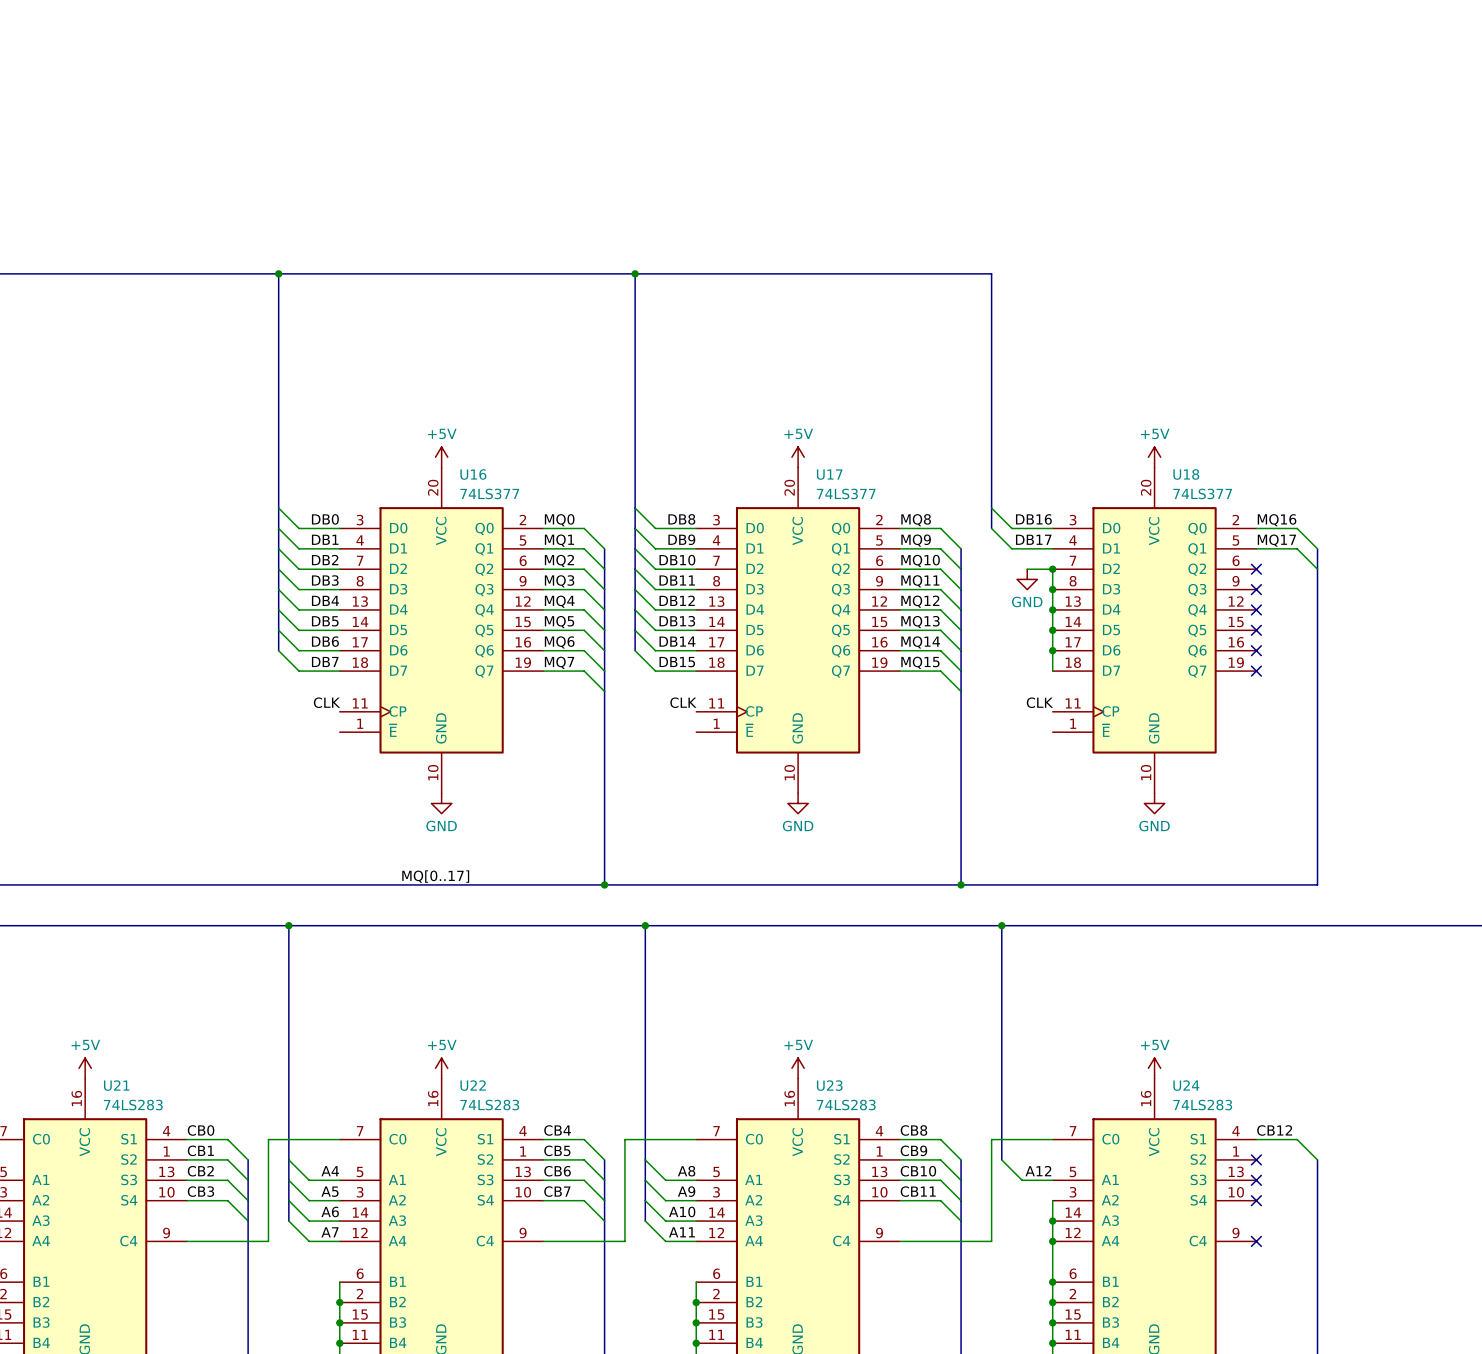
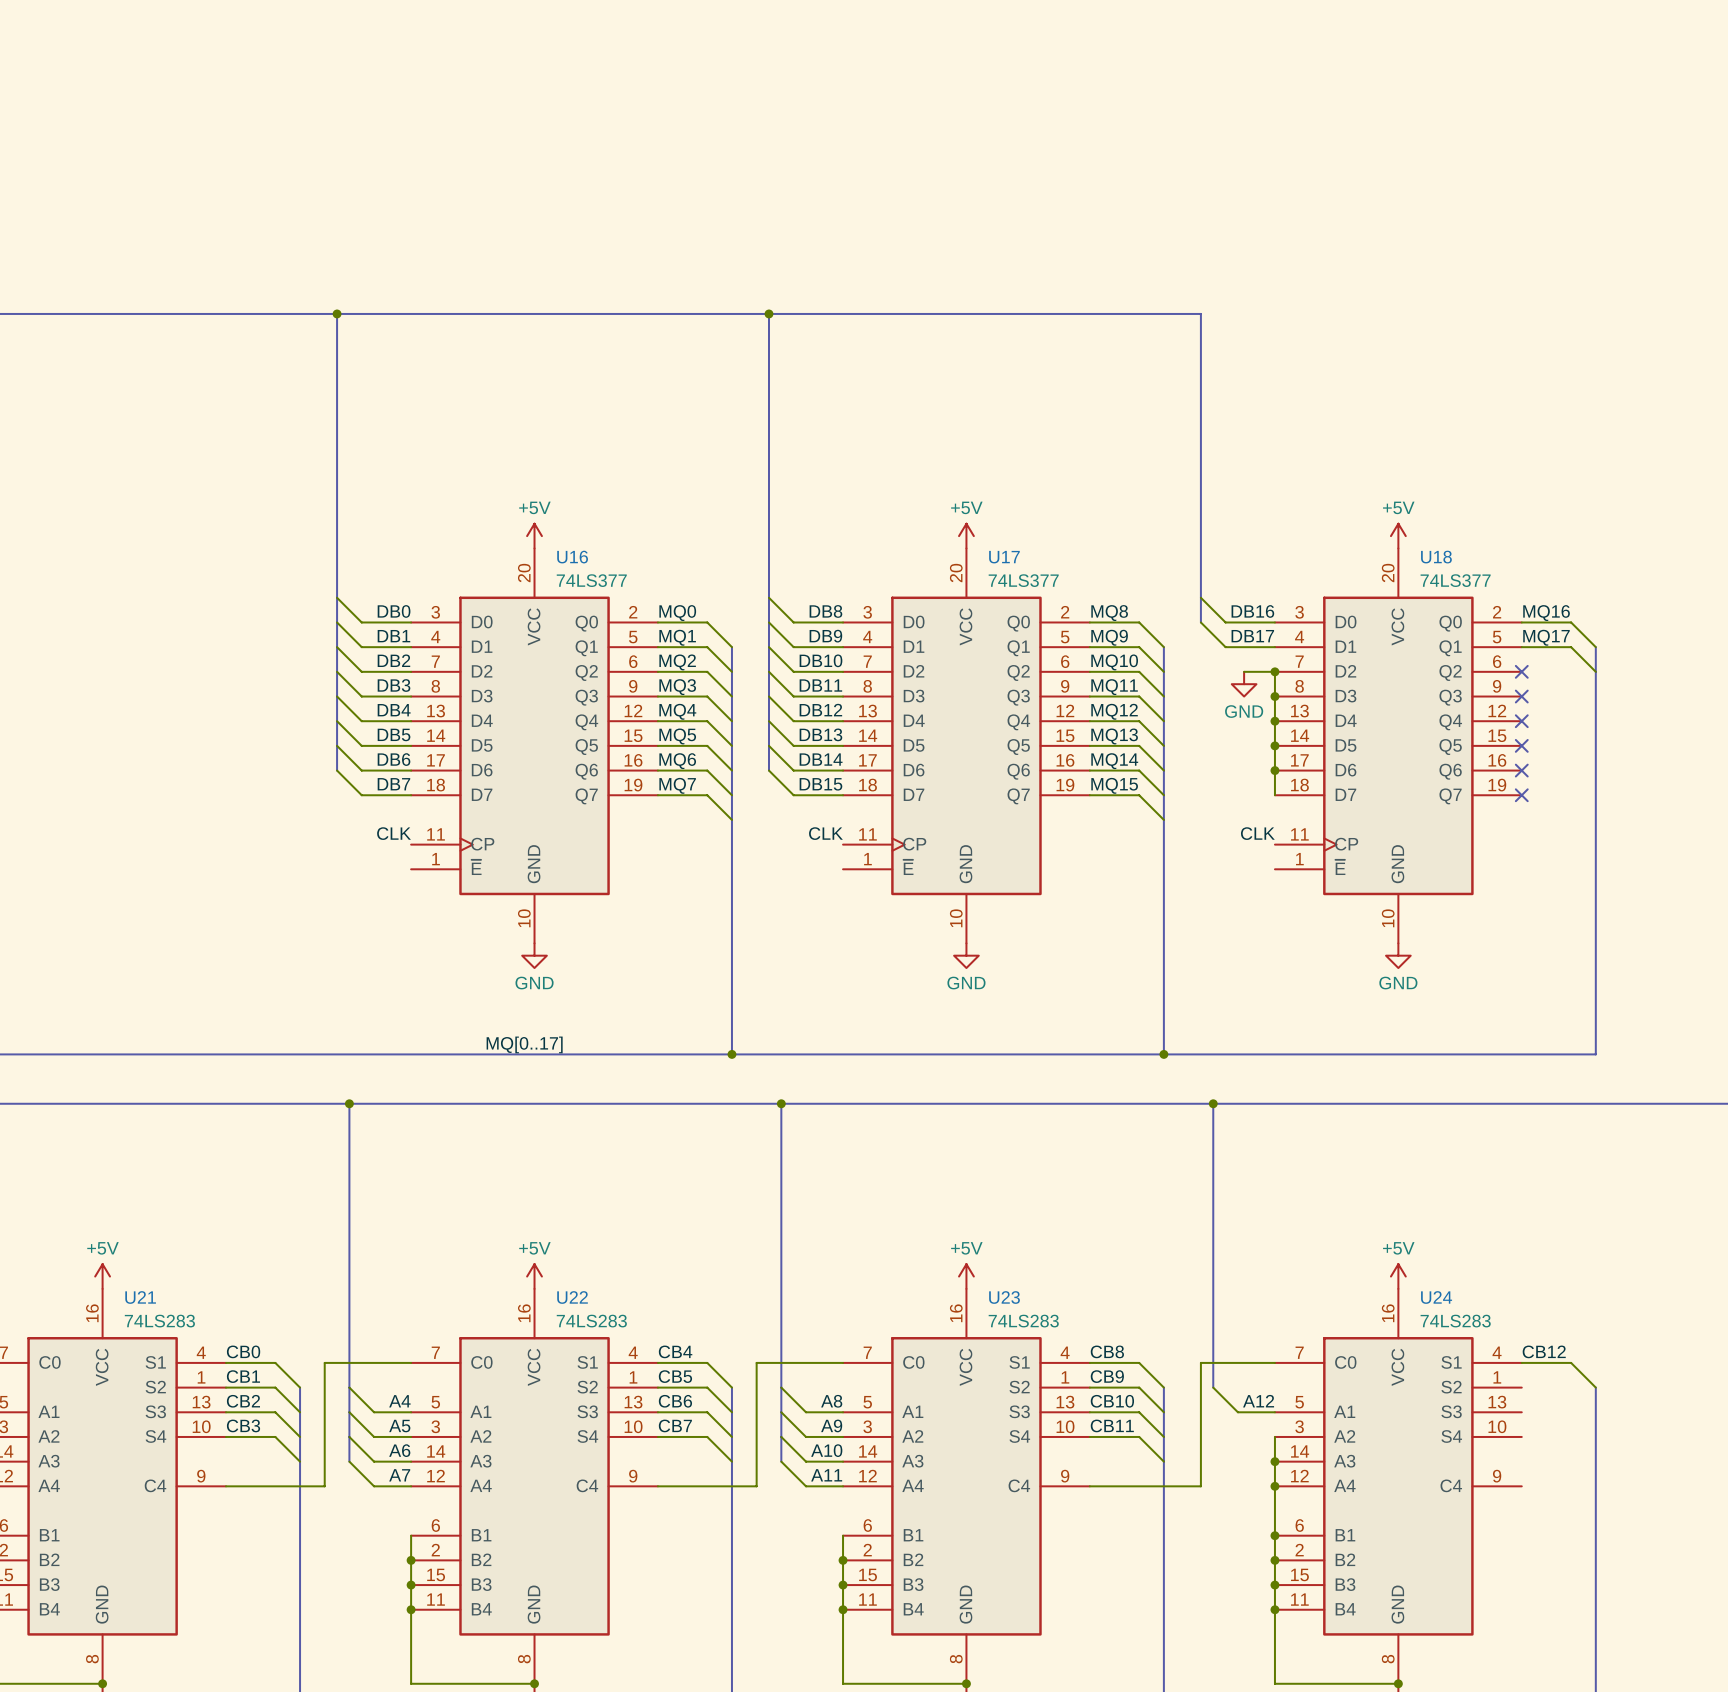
no-connect mark: (1256, 1159) -> none
no-connect mark: (1256, 1180) -> none
no-connect mark: (1256, 1200) -> none
no-connect mark: (1256, 1241) -> none

